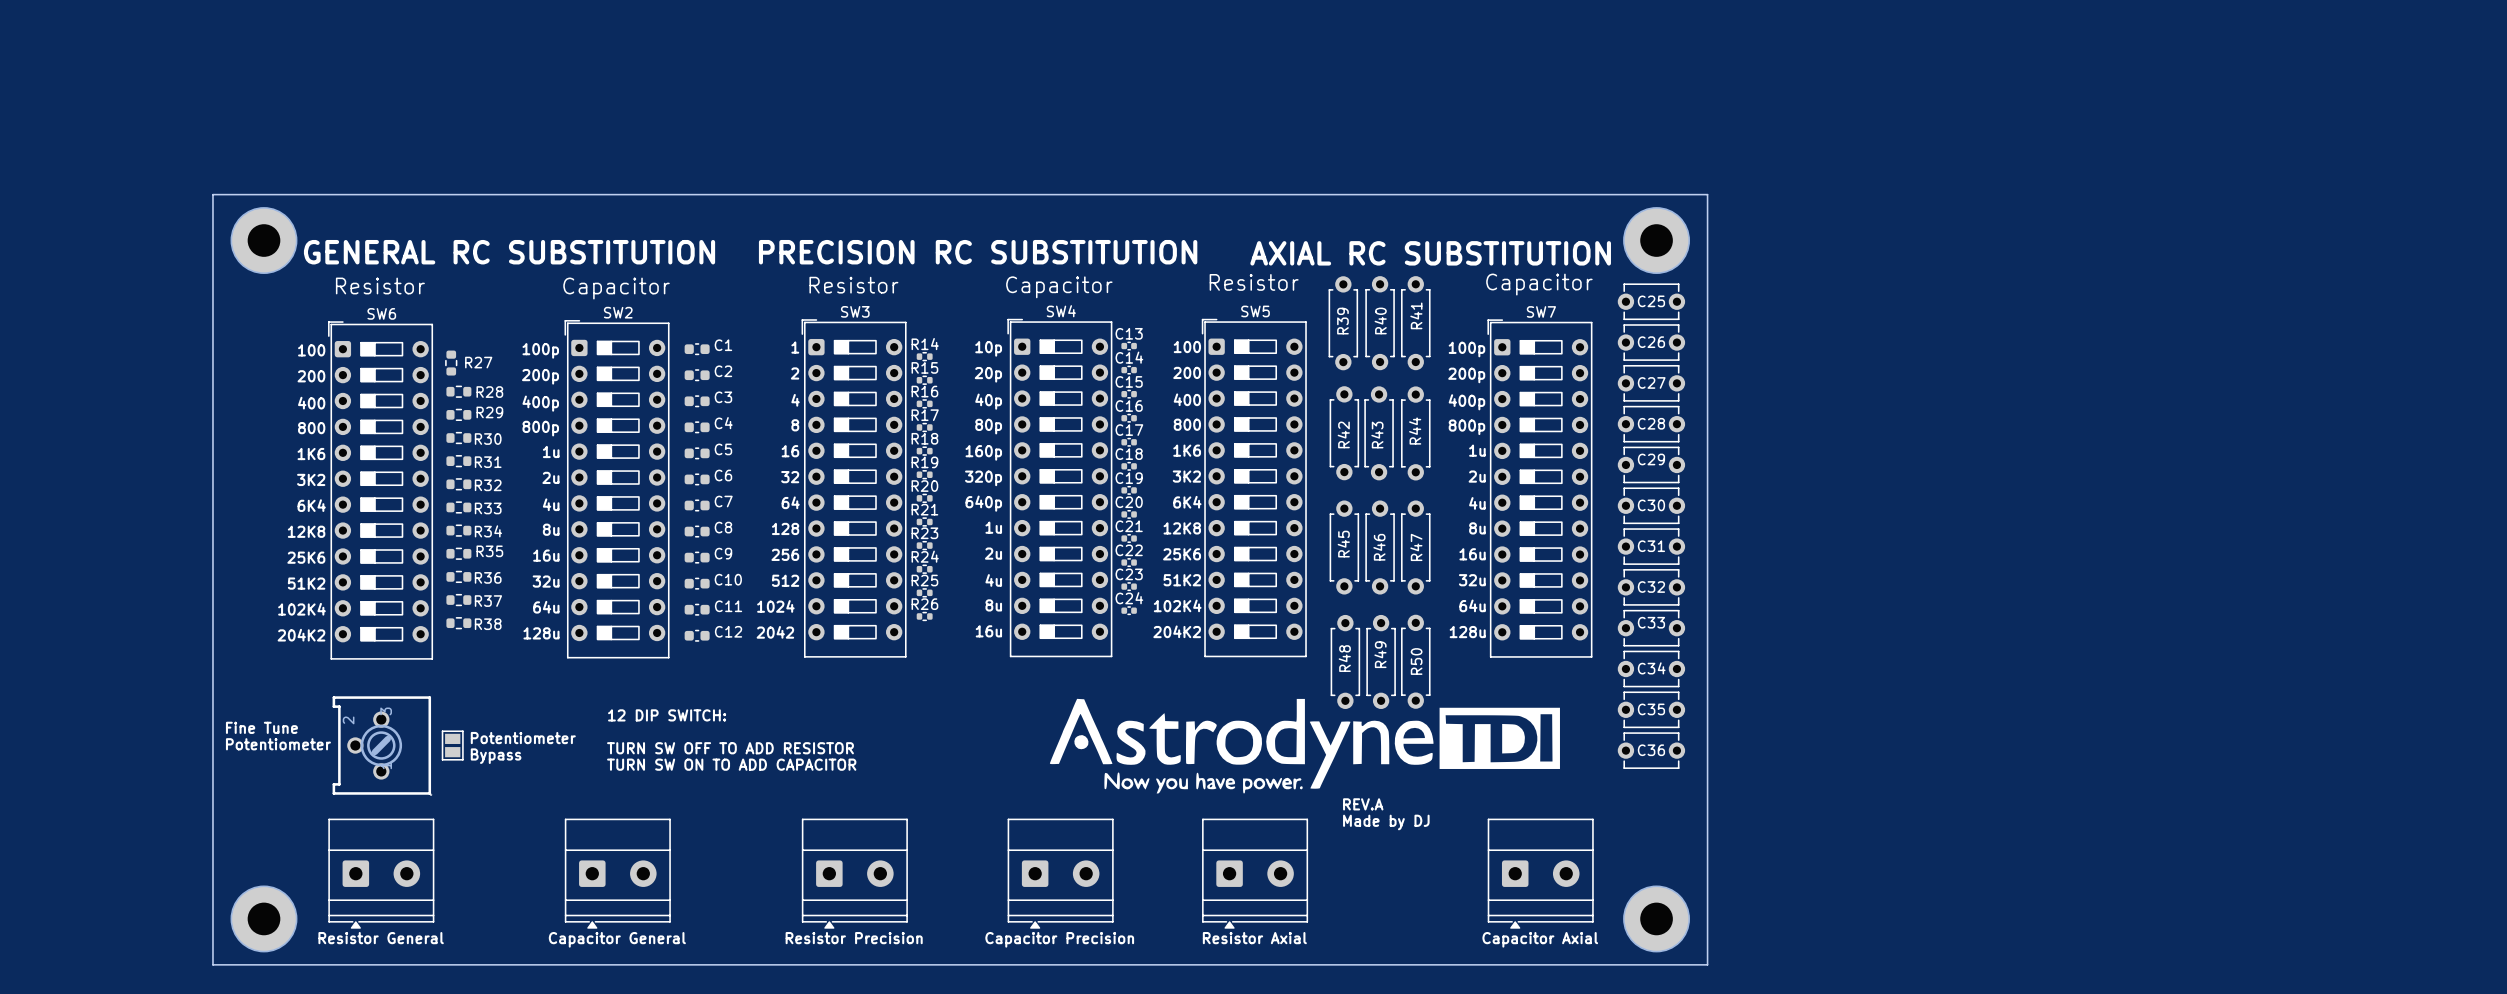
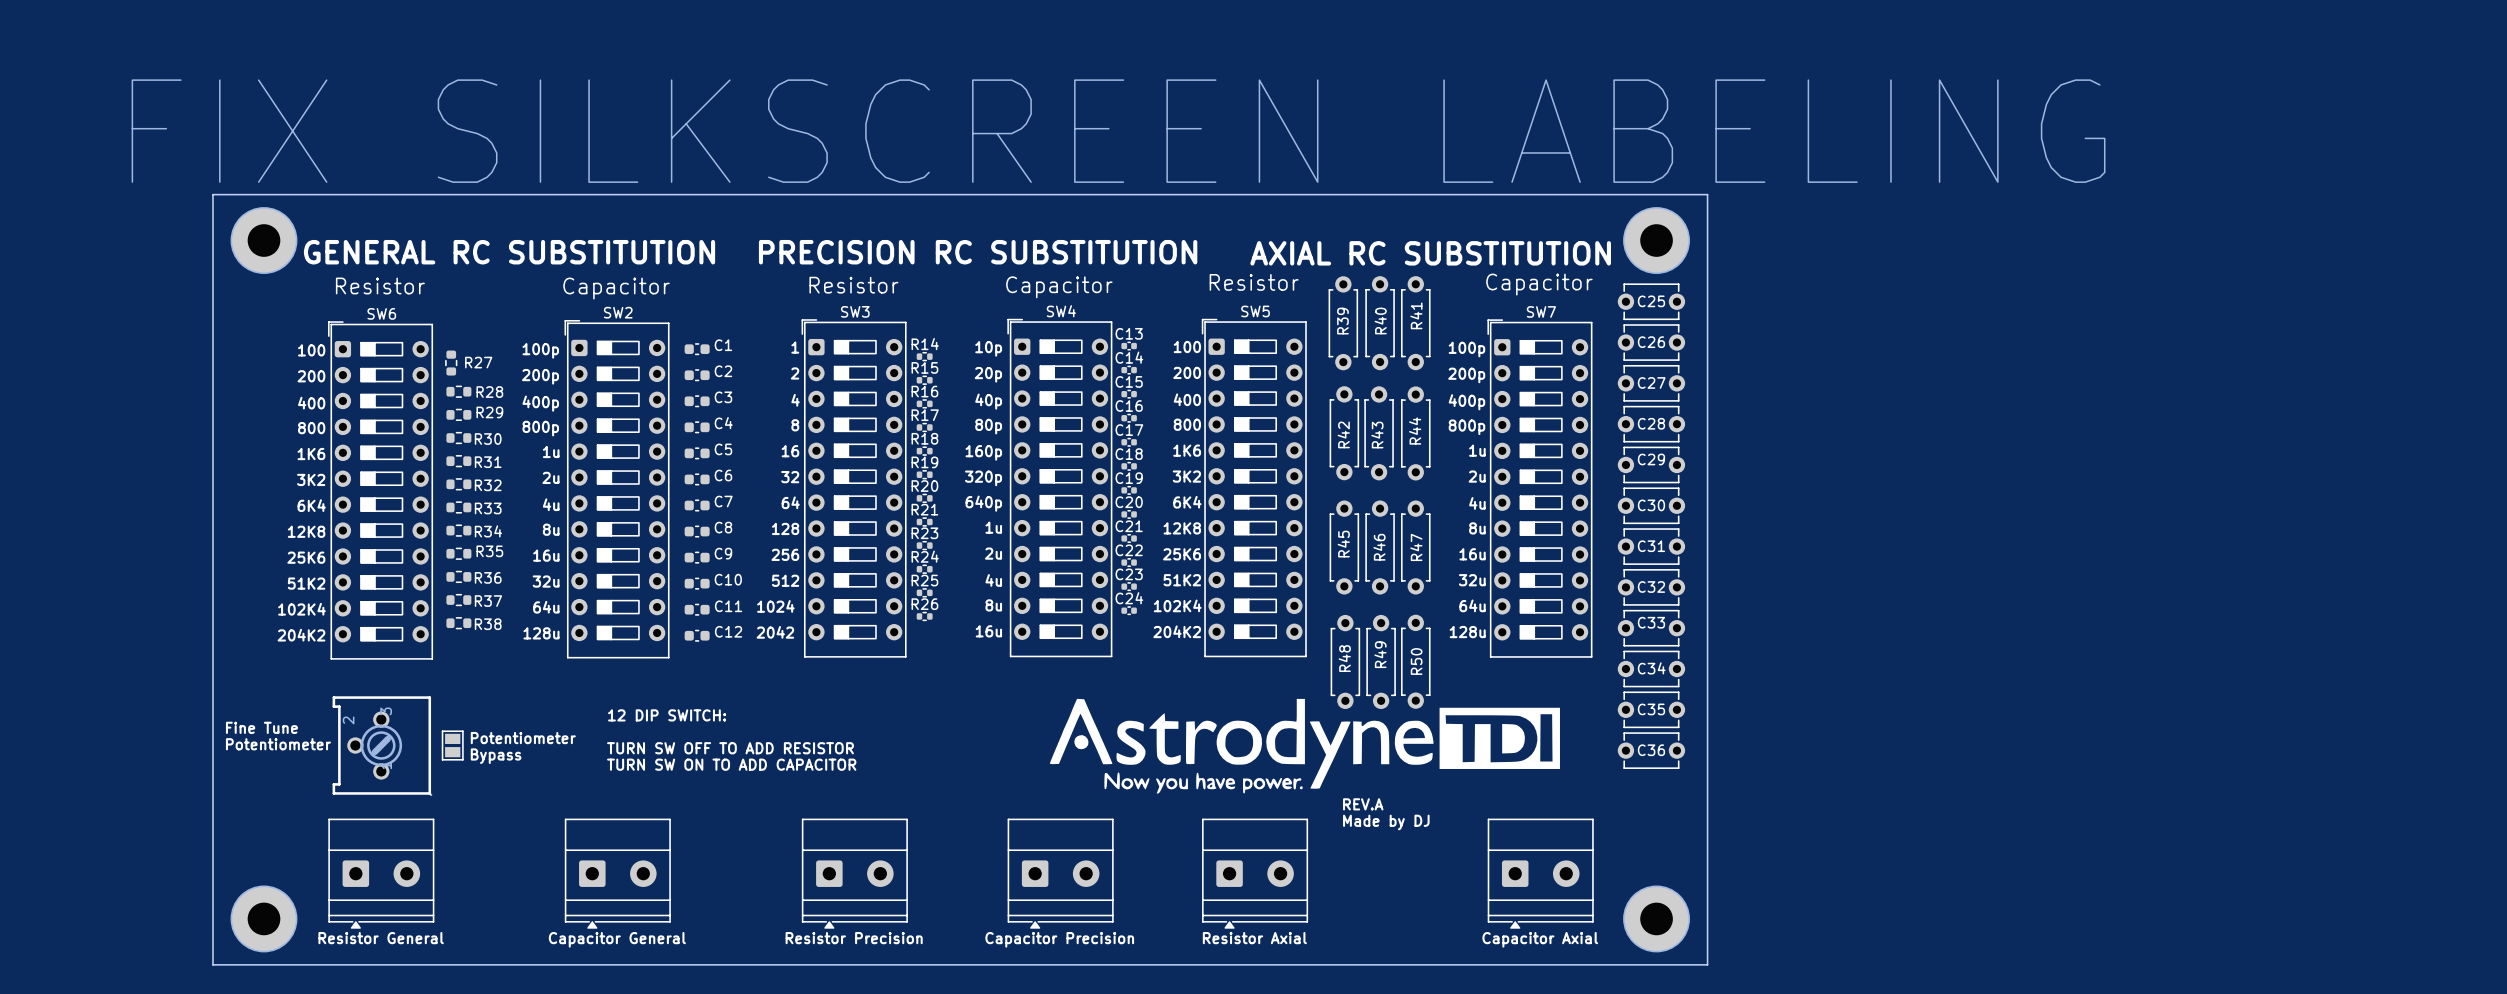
text: none -> FIX SILKSCREEN LABELING (1118, 131)

